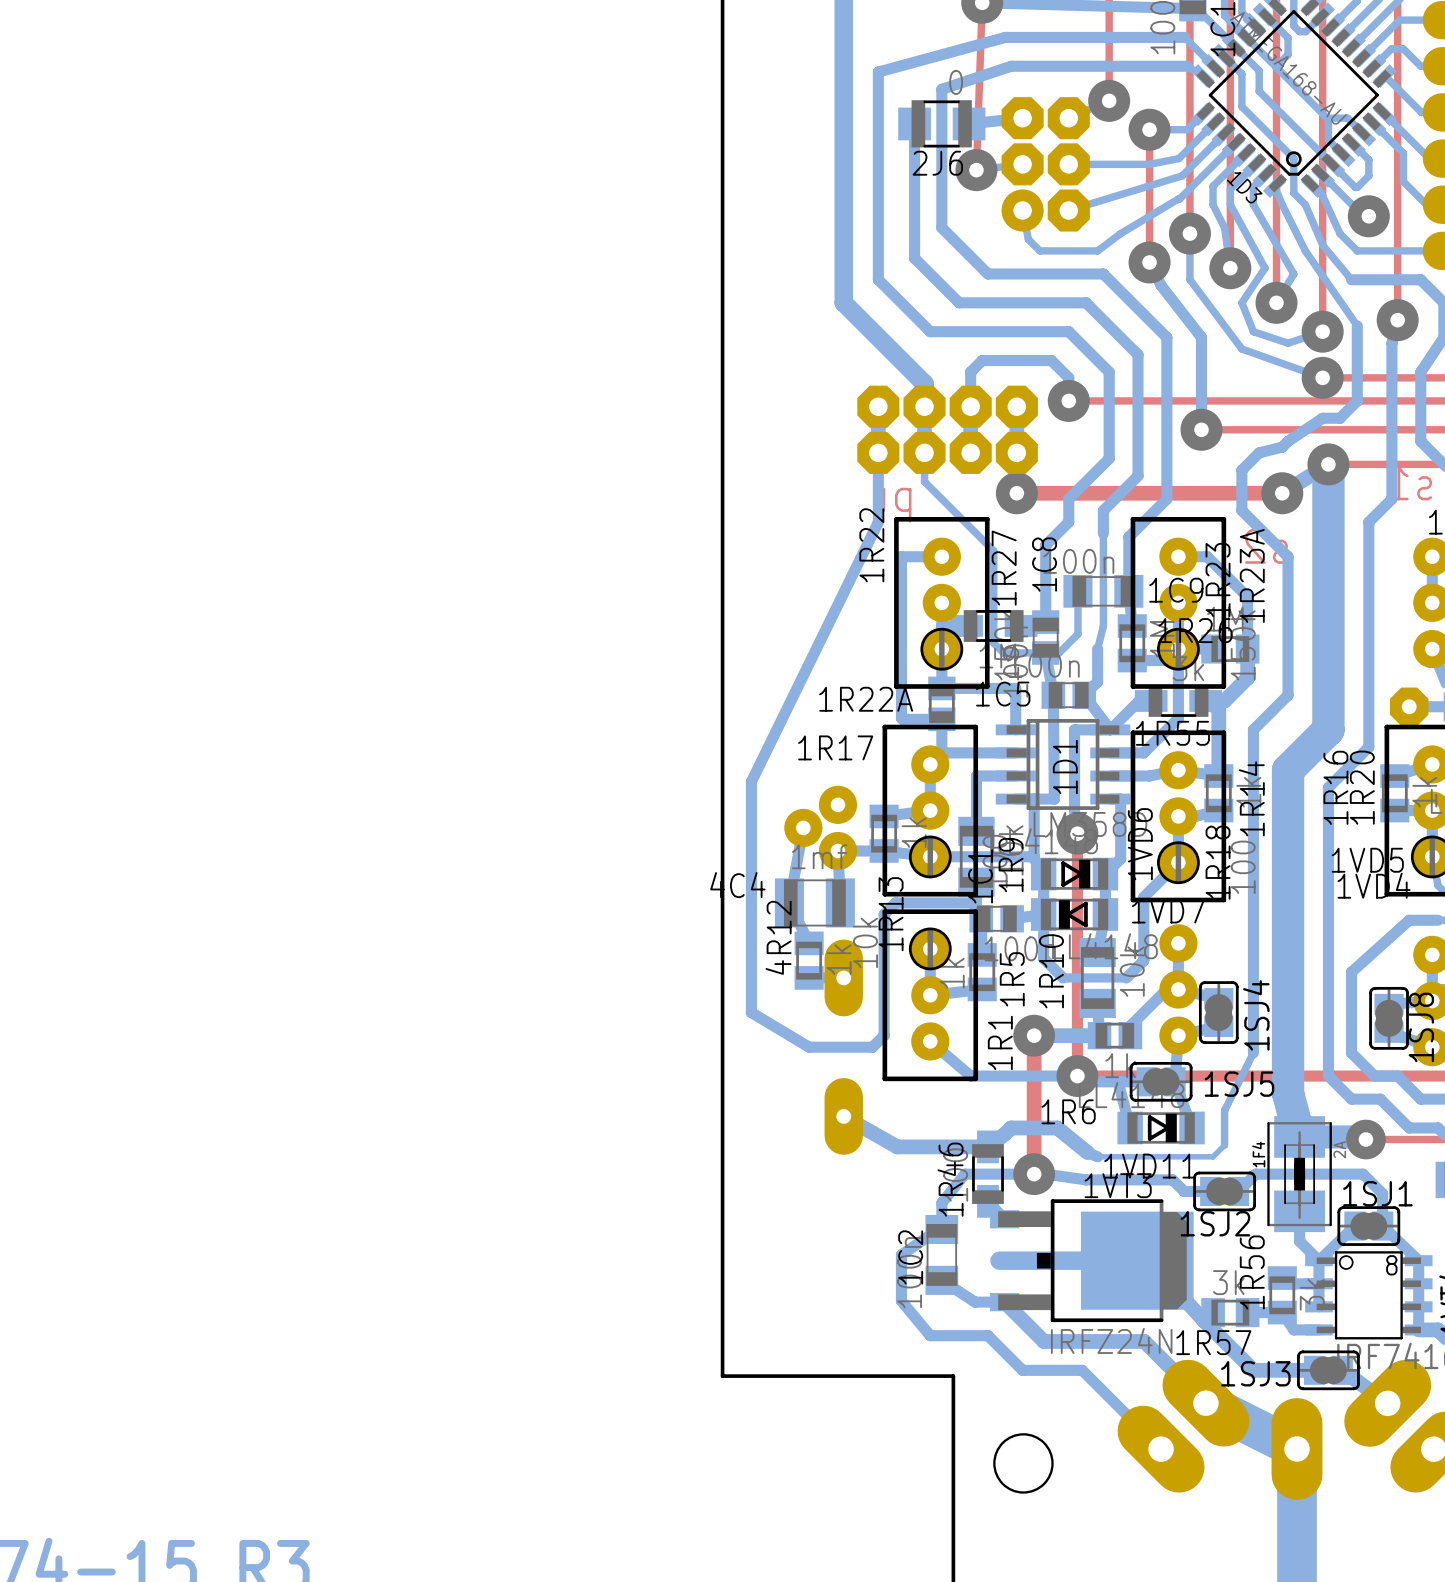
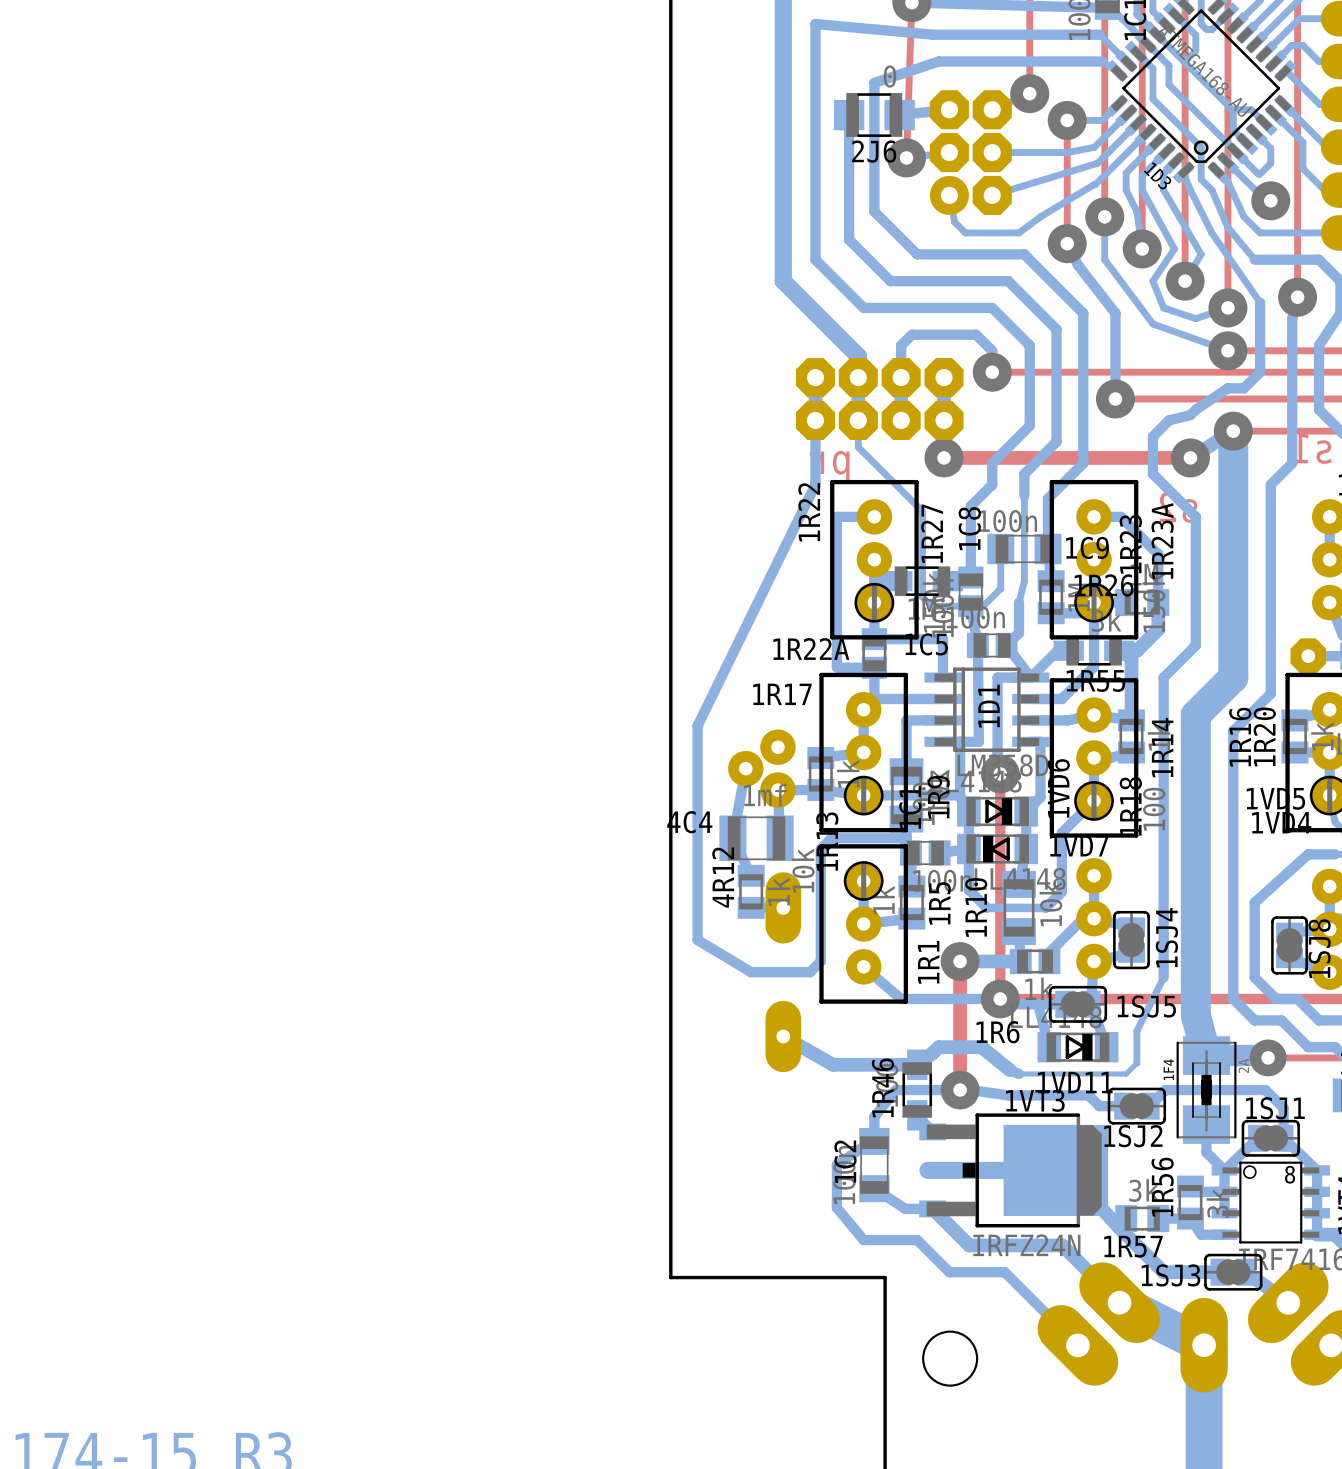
bottom track: (1005, 37) (878, 72) -> (933, 34) (815, 24) (815, 66)

